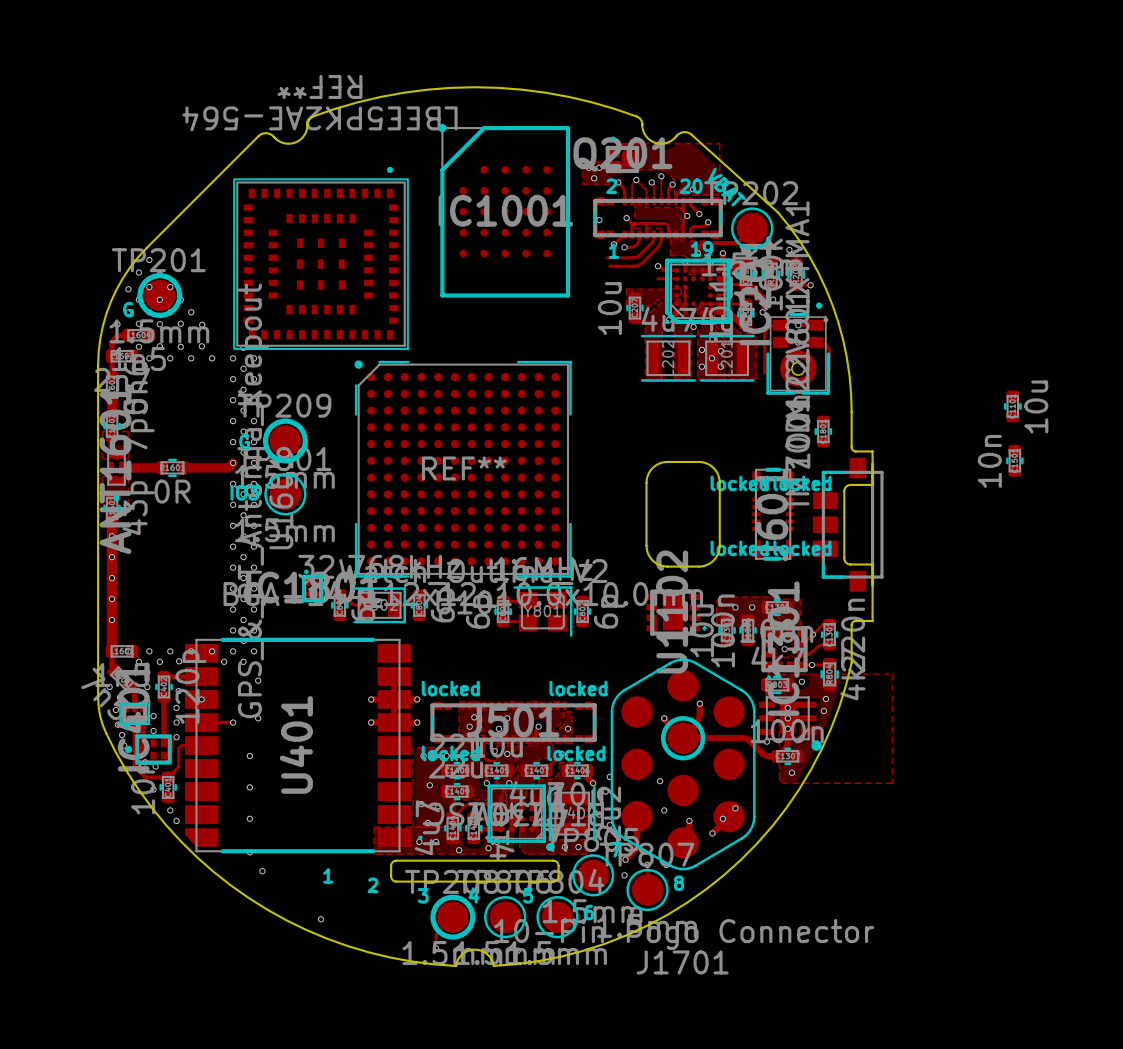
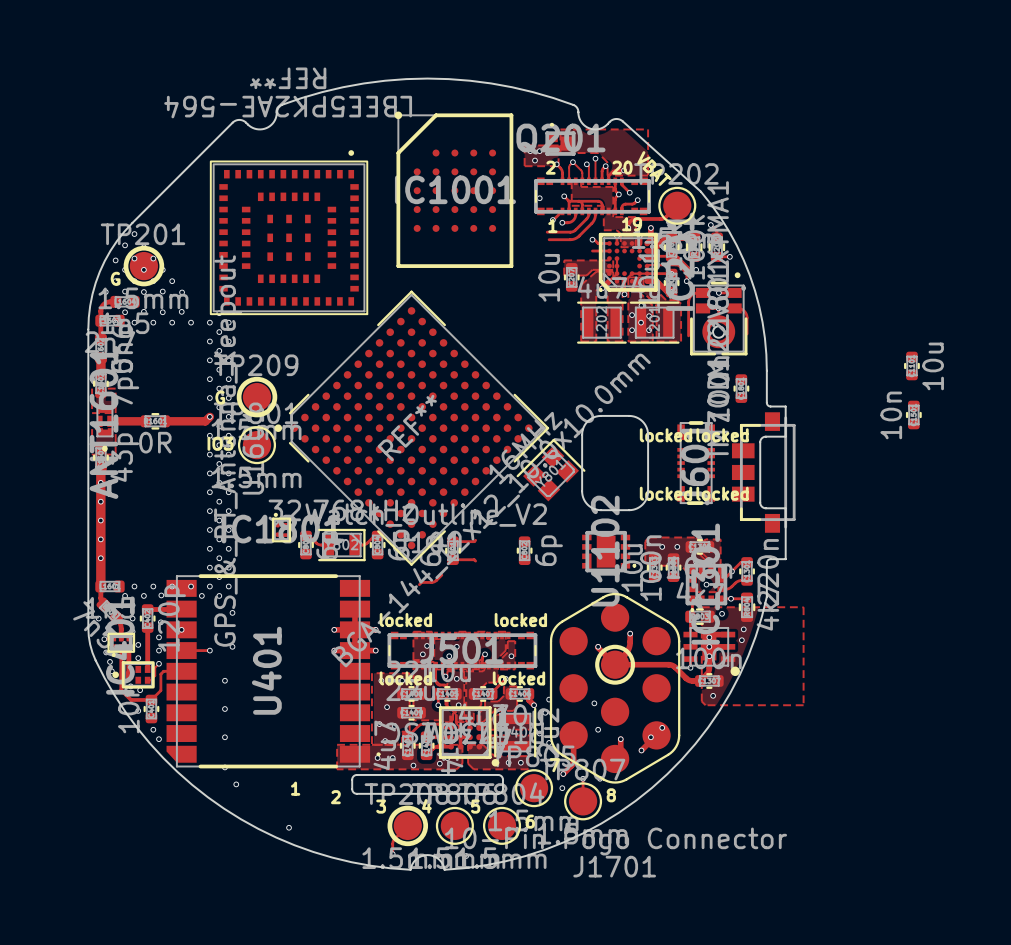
REF** rotation: 0° (463, 469) -> 45° counterclockwise (411, 428)
Y801 rotation: 0° (542, 611) -> 45° counterclockwise (551, 470)
Y801 position: (542, 611) -> (551, 470)
track: none -> (441, 575) (434, 581) (421, 582) (419, 584)

